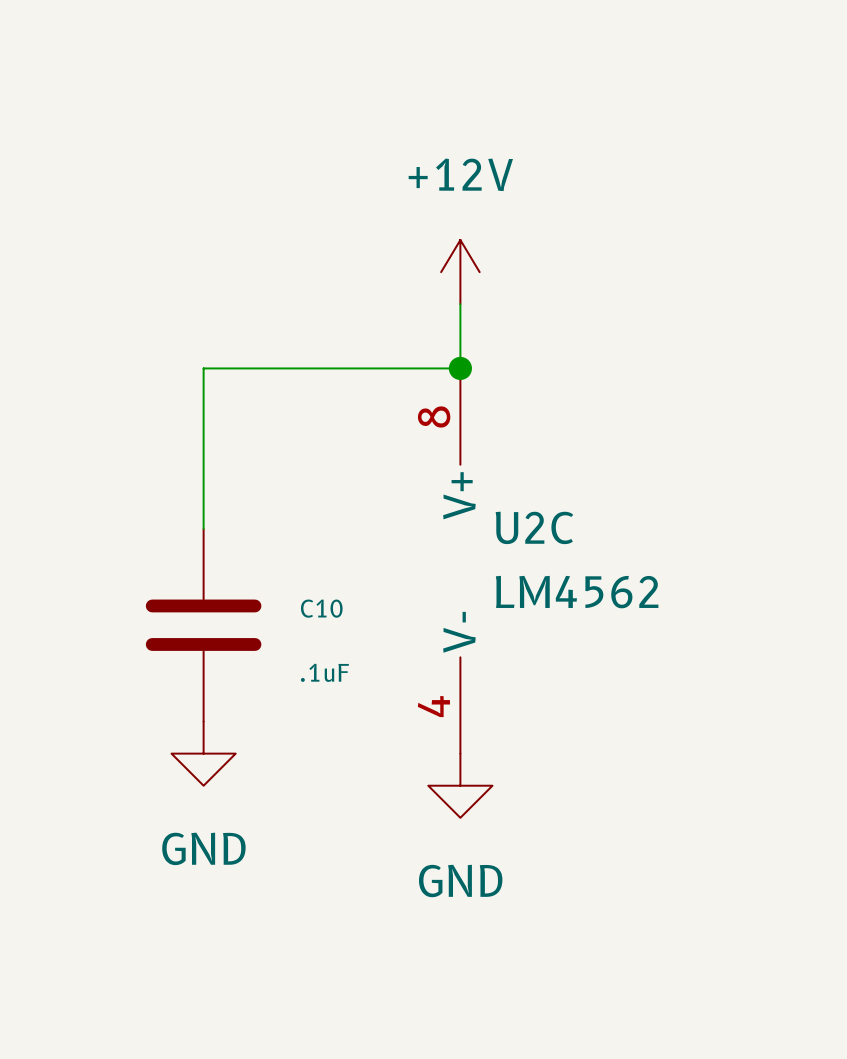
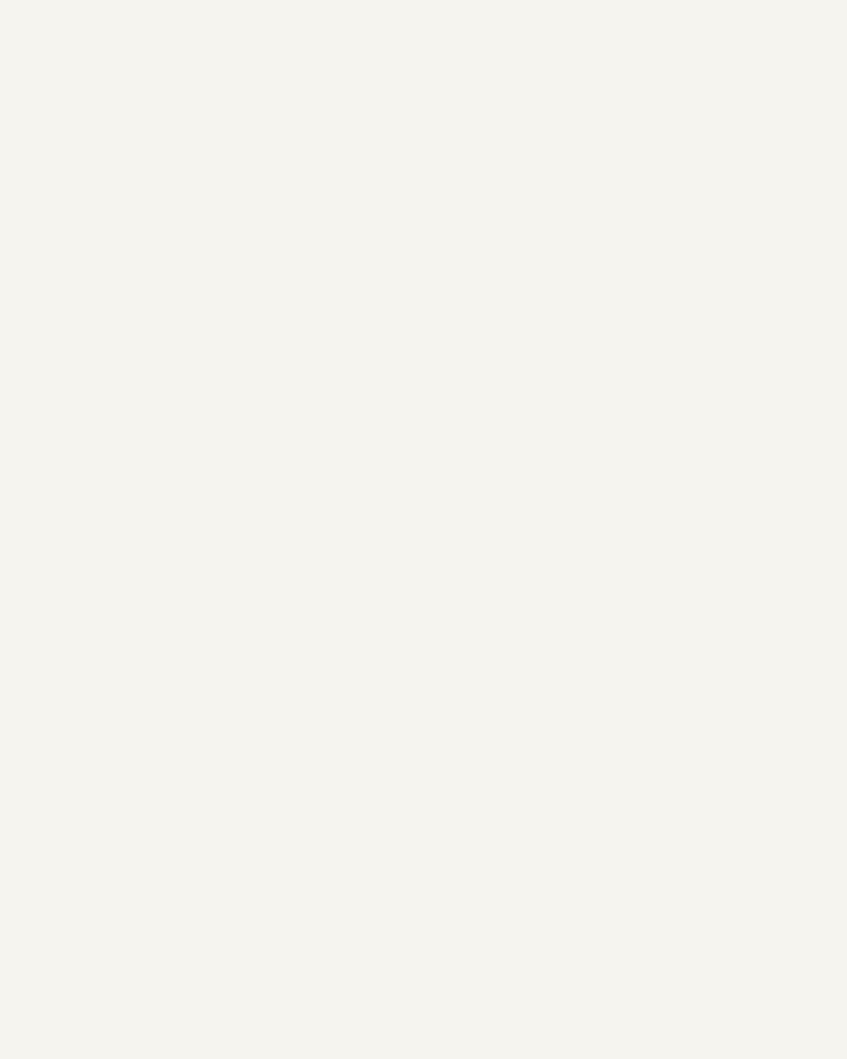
power symbol: +12V (460, 272) -> none
wire: (460, 304) (460, 368) (203, 368) (203, 528) -> none
junction: (460, 368) -> none
U2C: LM4562 (460, 561) -> none
C10: .1uF (203, 625) -> none
power symbol: GND (203, 753) -> none
power symbol: GND (460, 785) -> none

